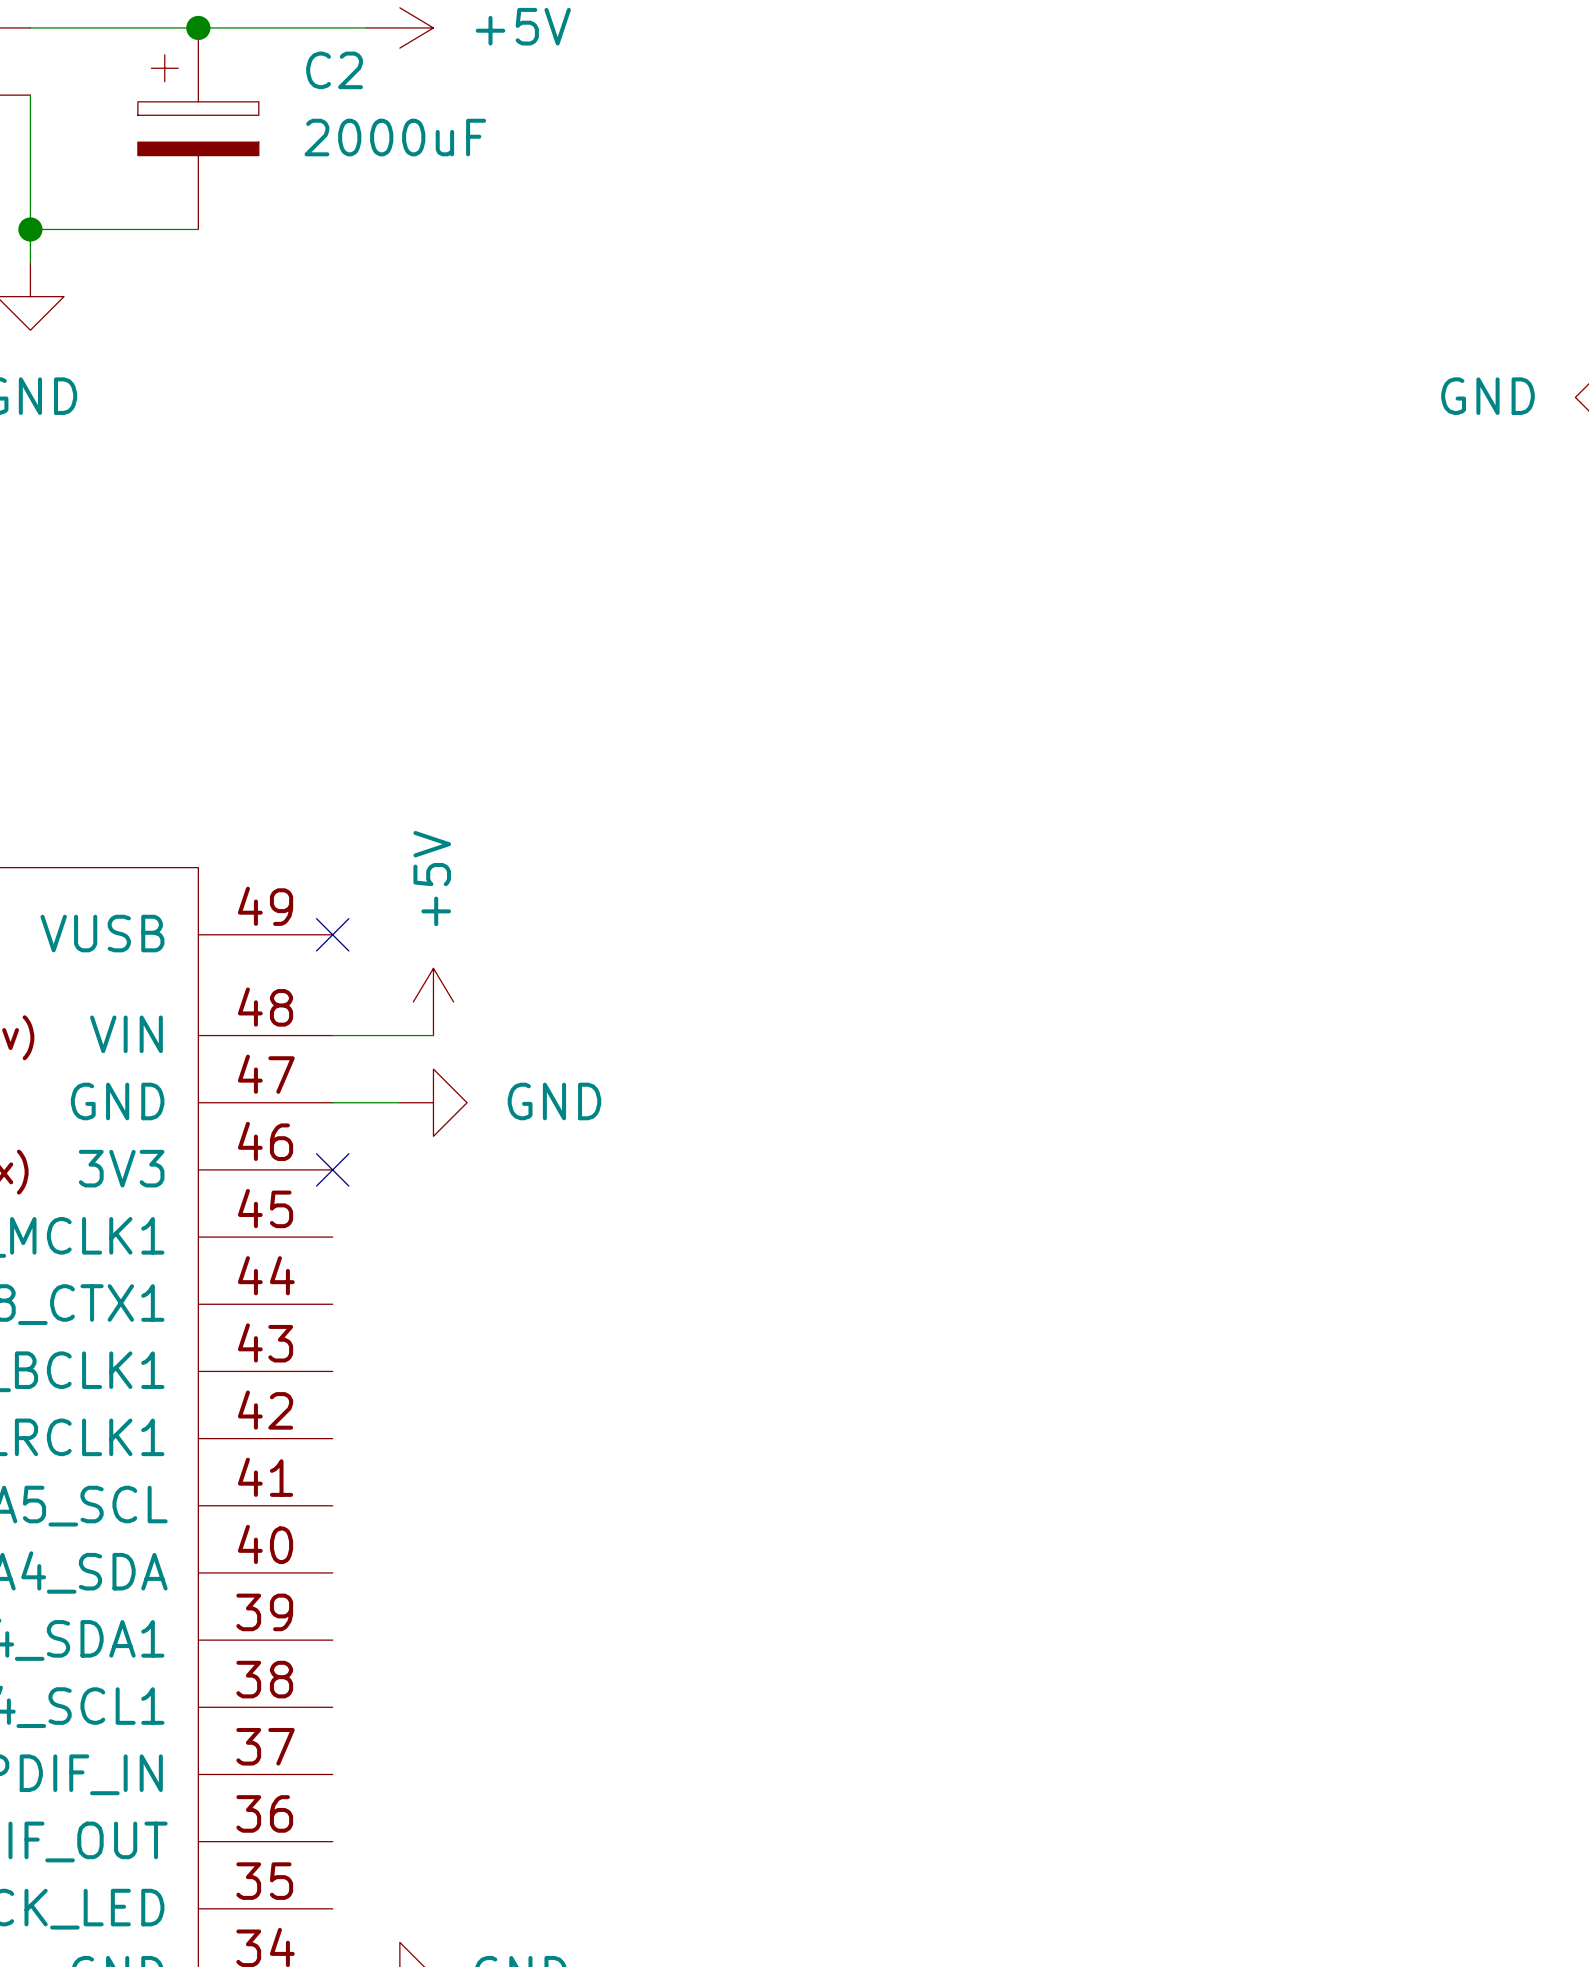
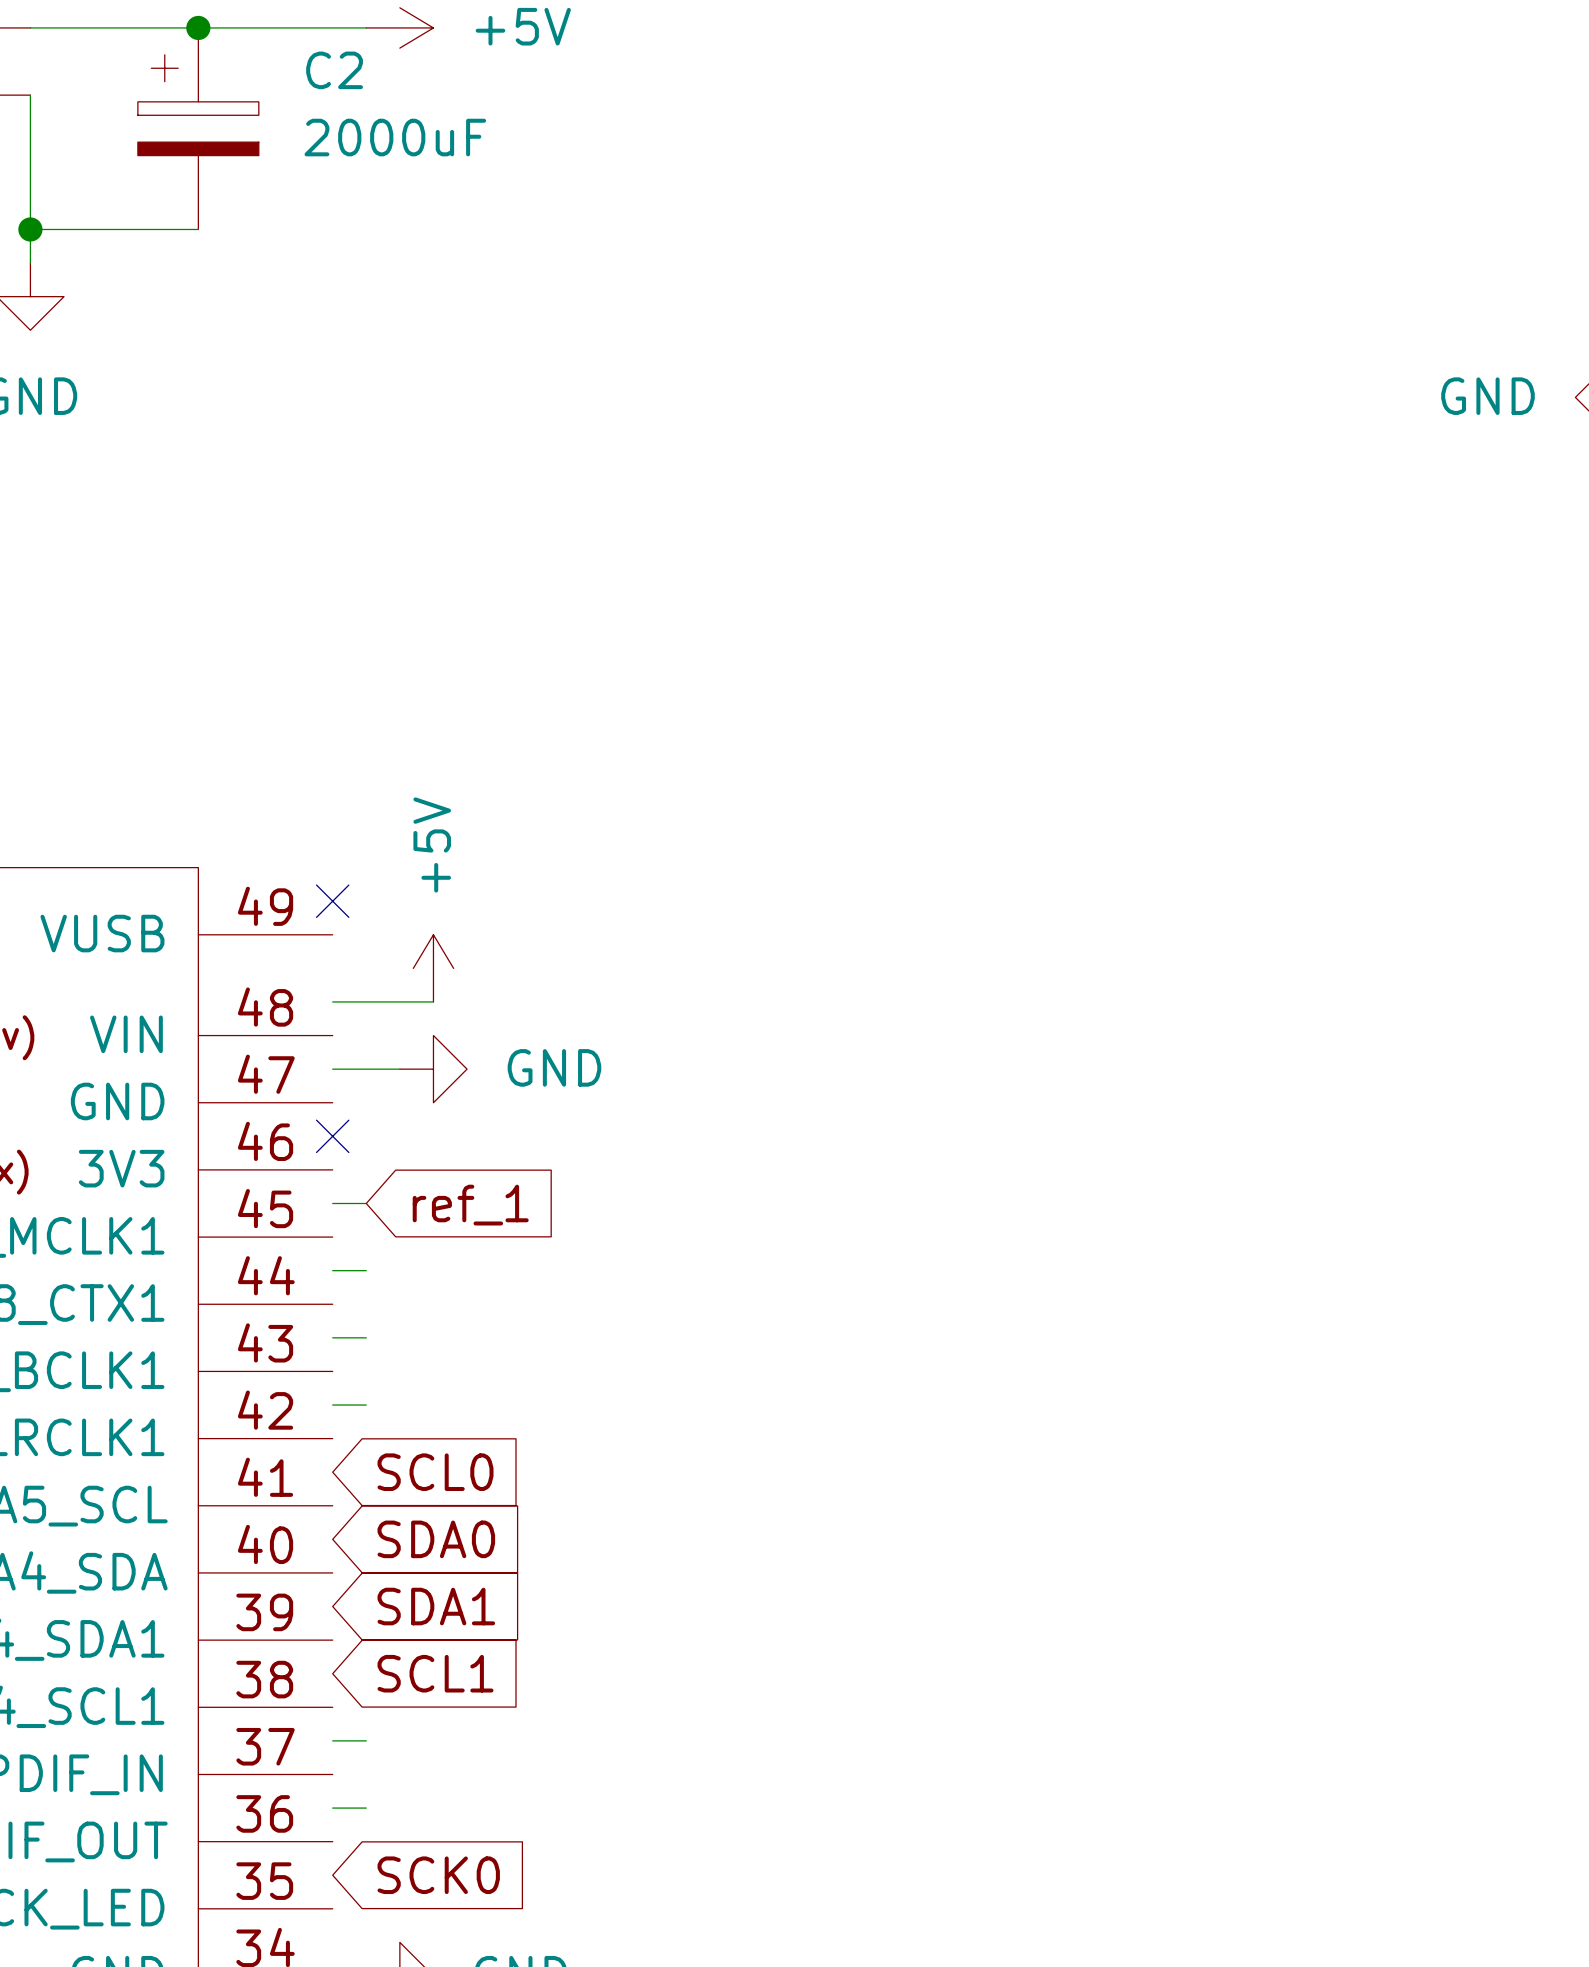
no-connect mark position: (332, 934) -> (332, 901)
power symbol position: +5V (433, 1001) -> +5V (433, 968)
wire: (332, 1035) (433, 1035) -> (332, 1001) (433, 1001)
wire: (332, 1102) (399, 1102) -> (332, 1069) (399, 1069)
power symbol position: GND (433, 1102) -> GND (433, 1069)
no-connect mark position: (332, 1169) -> (332, 1136)
wire: none -> (332, 1203) (366, 1203)
global label: none -> ref_1 (470, 1205)
wire: none -> (332, 1270) (366, 1270)
wire: none -> (332, 1337) (366, 1337)
wire: none -> (332, 1405) (366, 1405)
global label: none -> SCL0 (435, 1472)
global label: none -> SDA0 (436, 1539)
global label: none -> SDA1 (436, 1606)
global label: none -> SCL1 (435, 1673)
wire: none -> (332, 1740) (366, 1740)
wire: none -> (332, 1808) (366, 1808)
global label: none -> SCK0 (438, 1875)

